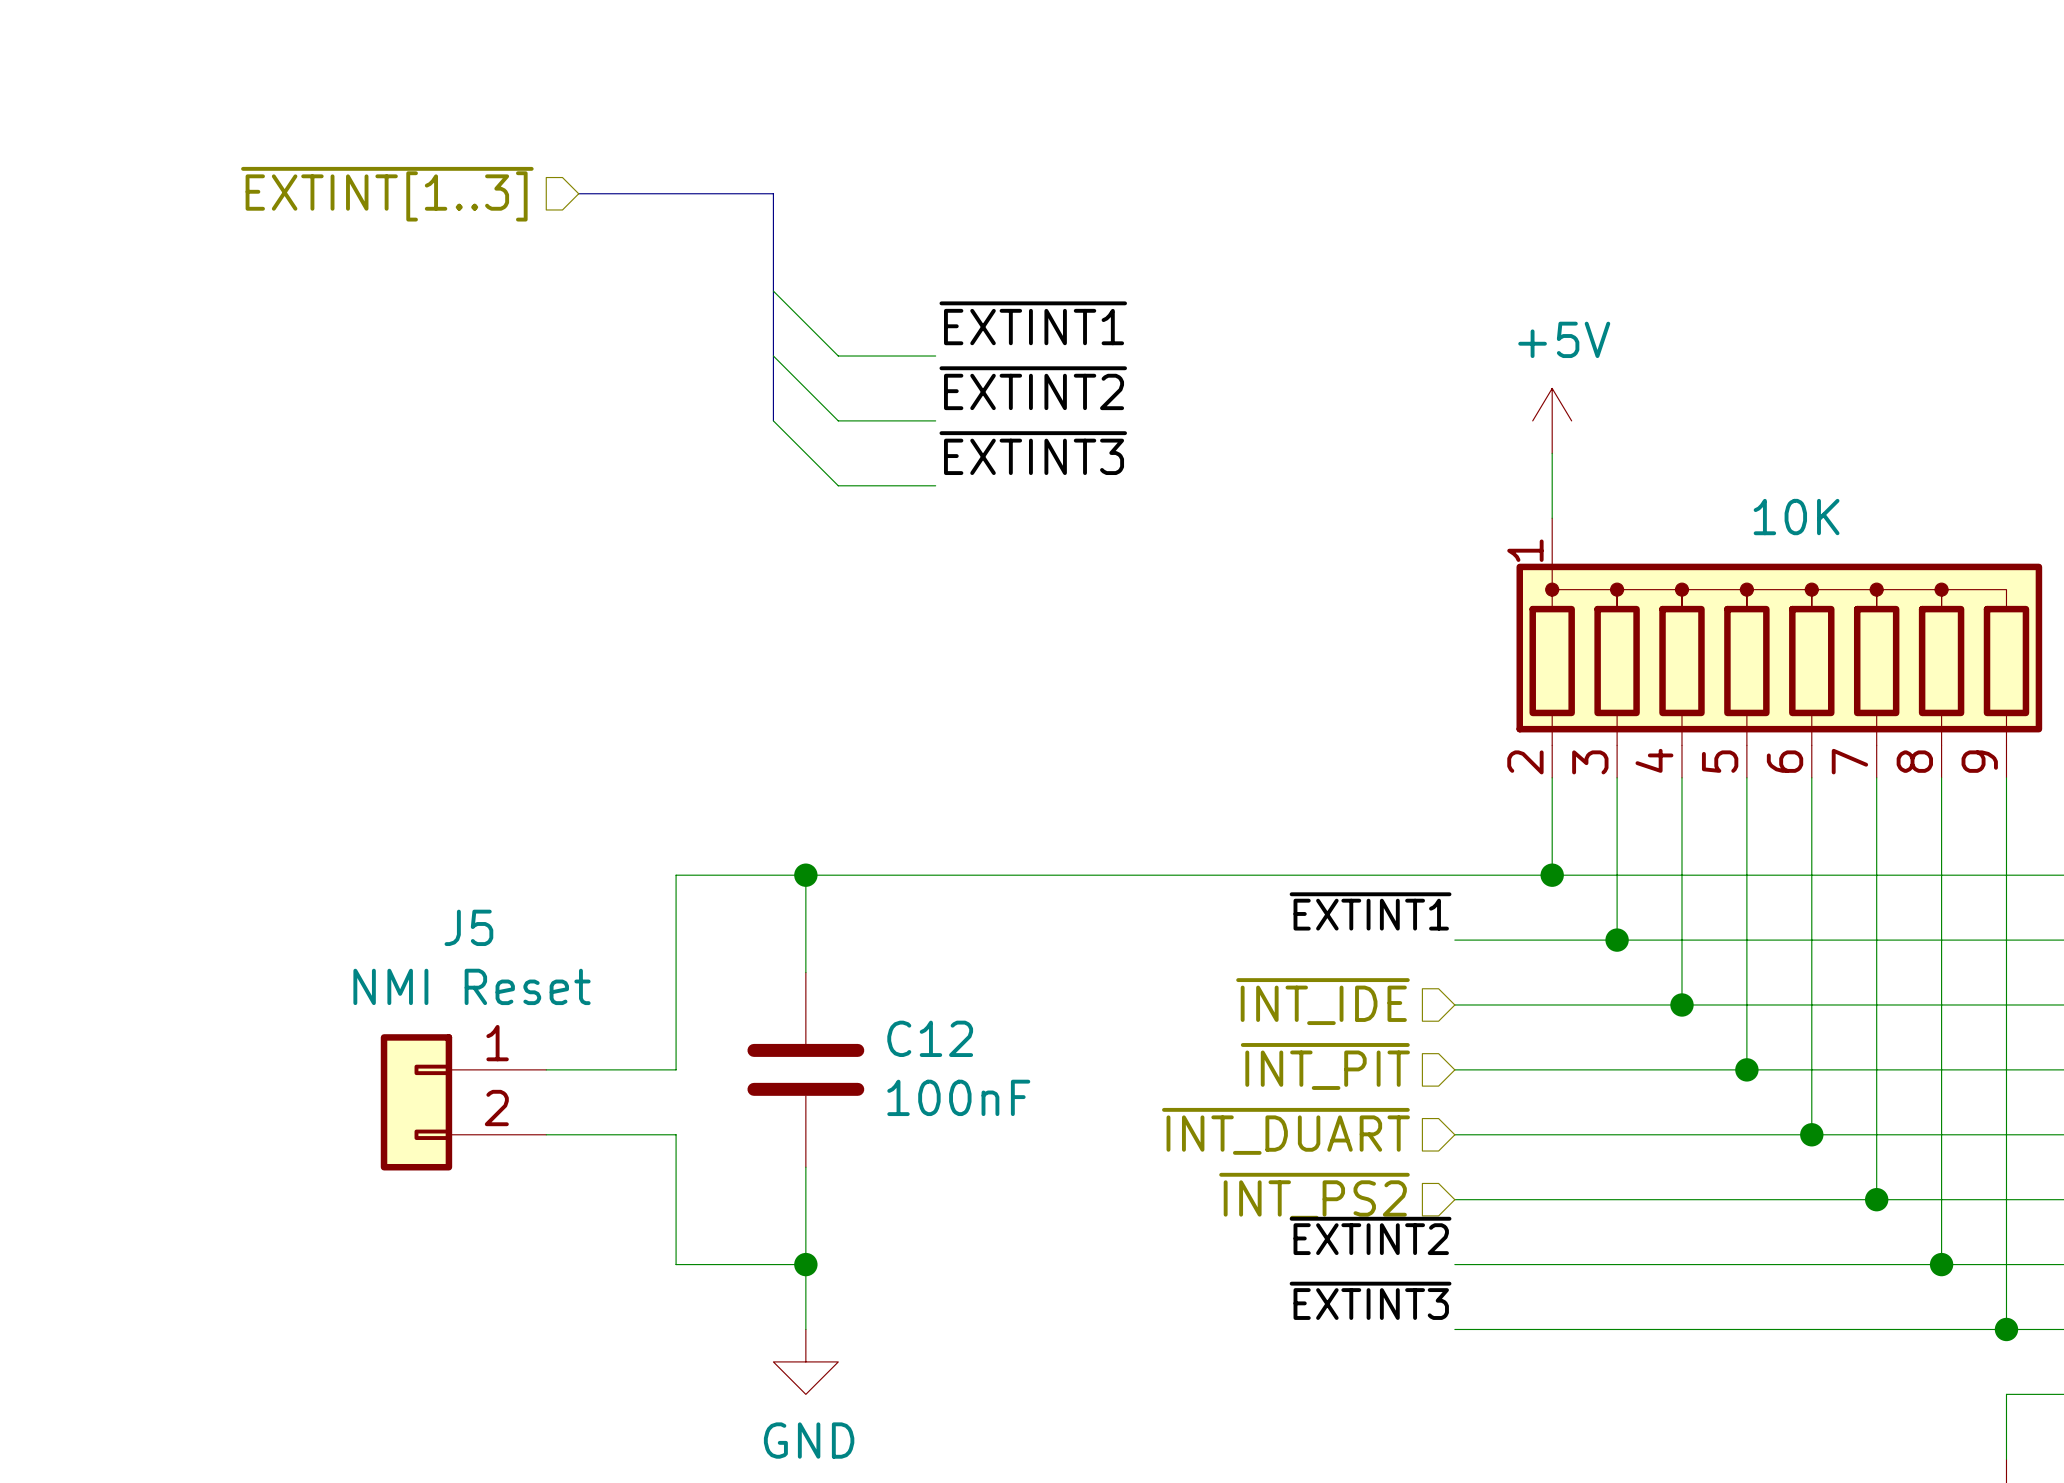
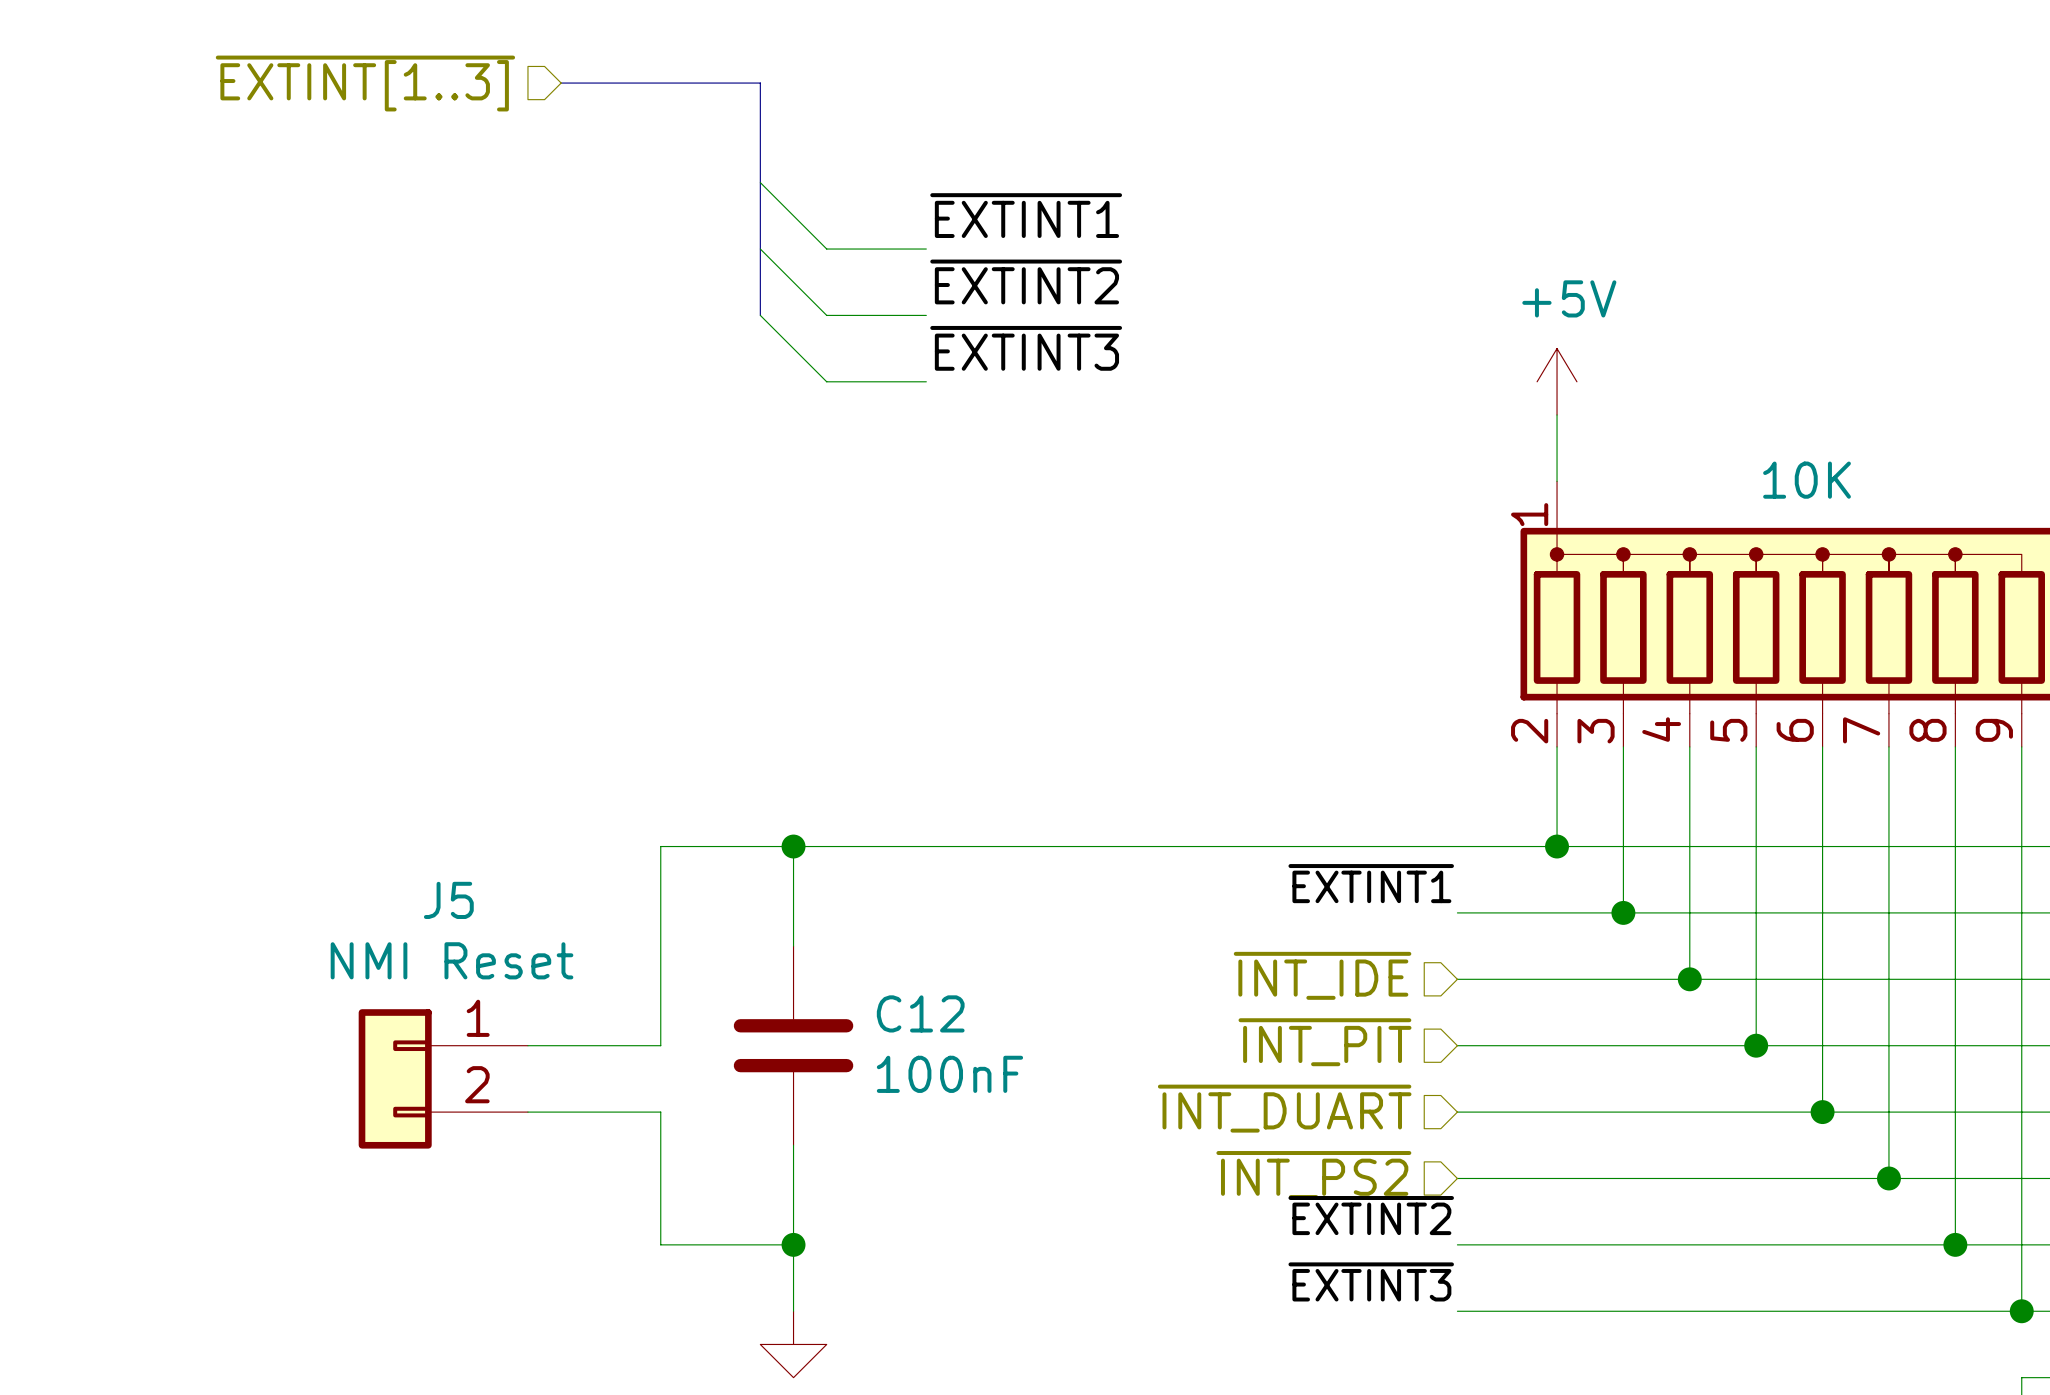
bus: (578, 193) (773, 193) -> (561, 83) (760, 83) (760, 149)
hierarchical label position: ~{EXTINT[1..3]} (387, 194) -> ~{EXTINT[1..3]} (365, 83)
label: none -> ~{EXTINT1} (1026, 215)
label: ~{EXTINT1} (1033, 323) -> ~{EXTINT2} (1026, 281)
bus: (773, 356) (773, 420) -> none
label: ~{EXTINT2} (1033, 388) -> ~{EXTINT3} (1026, 348)
wire: (773, 420) (838, 485) (935, 485) -> (760, 182) (826, 249) (926, 249)
label: ~{EXTINT3} (1033, 453) -> none

